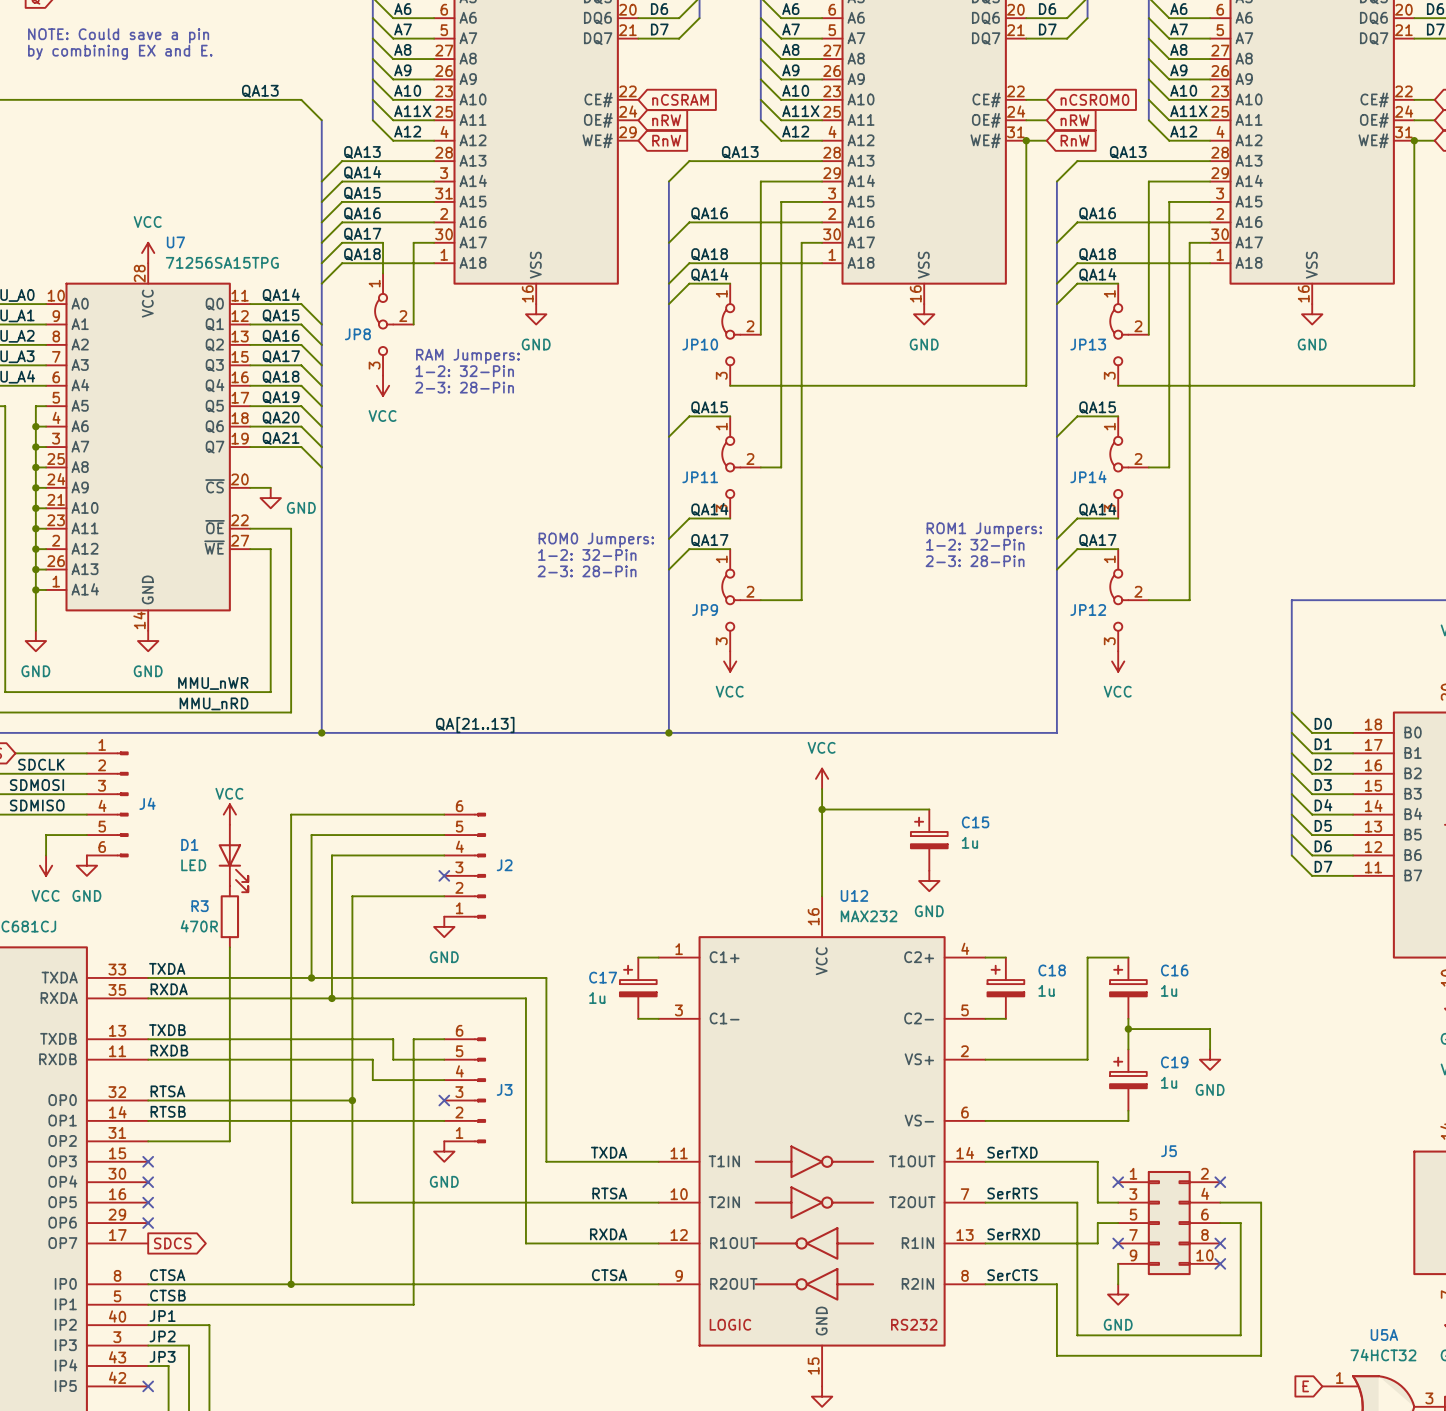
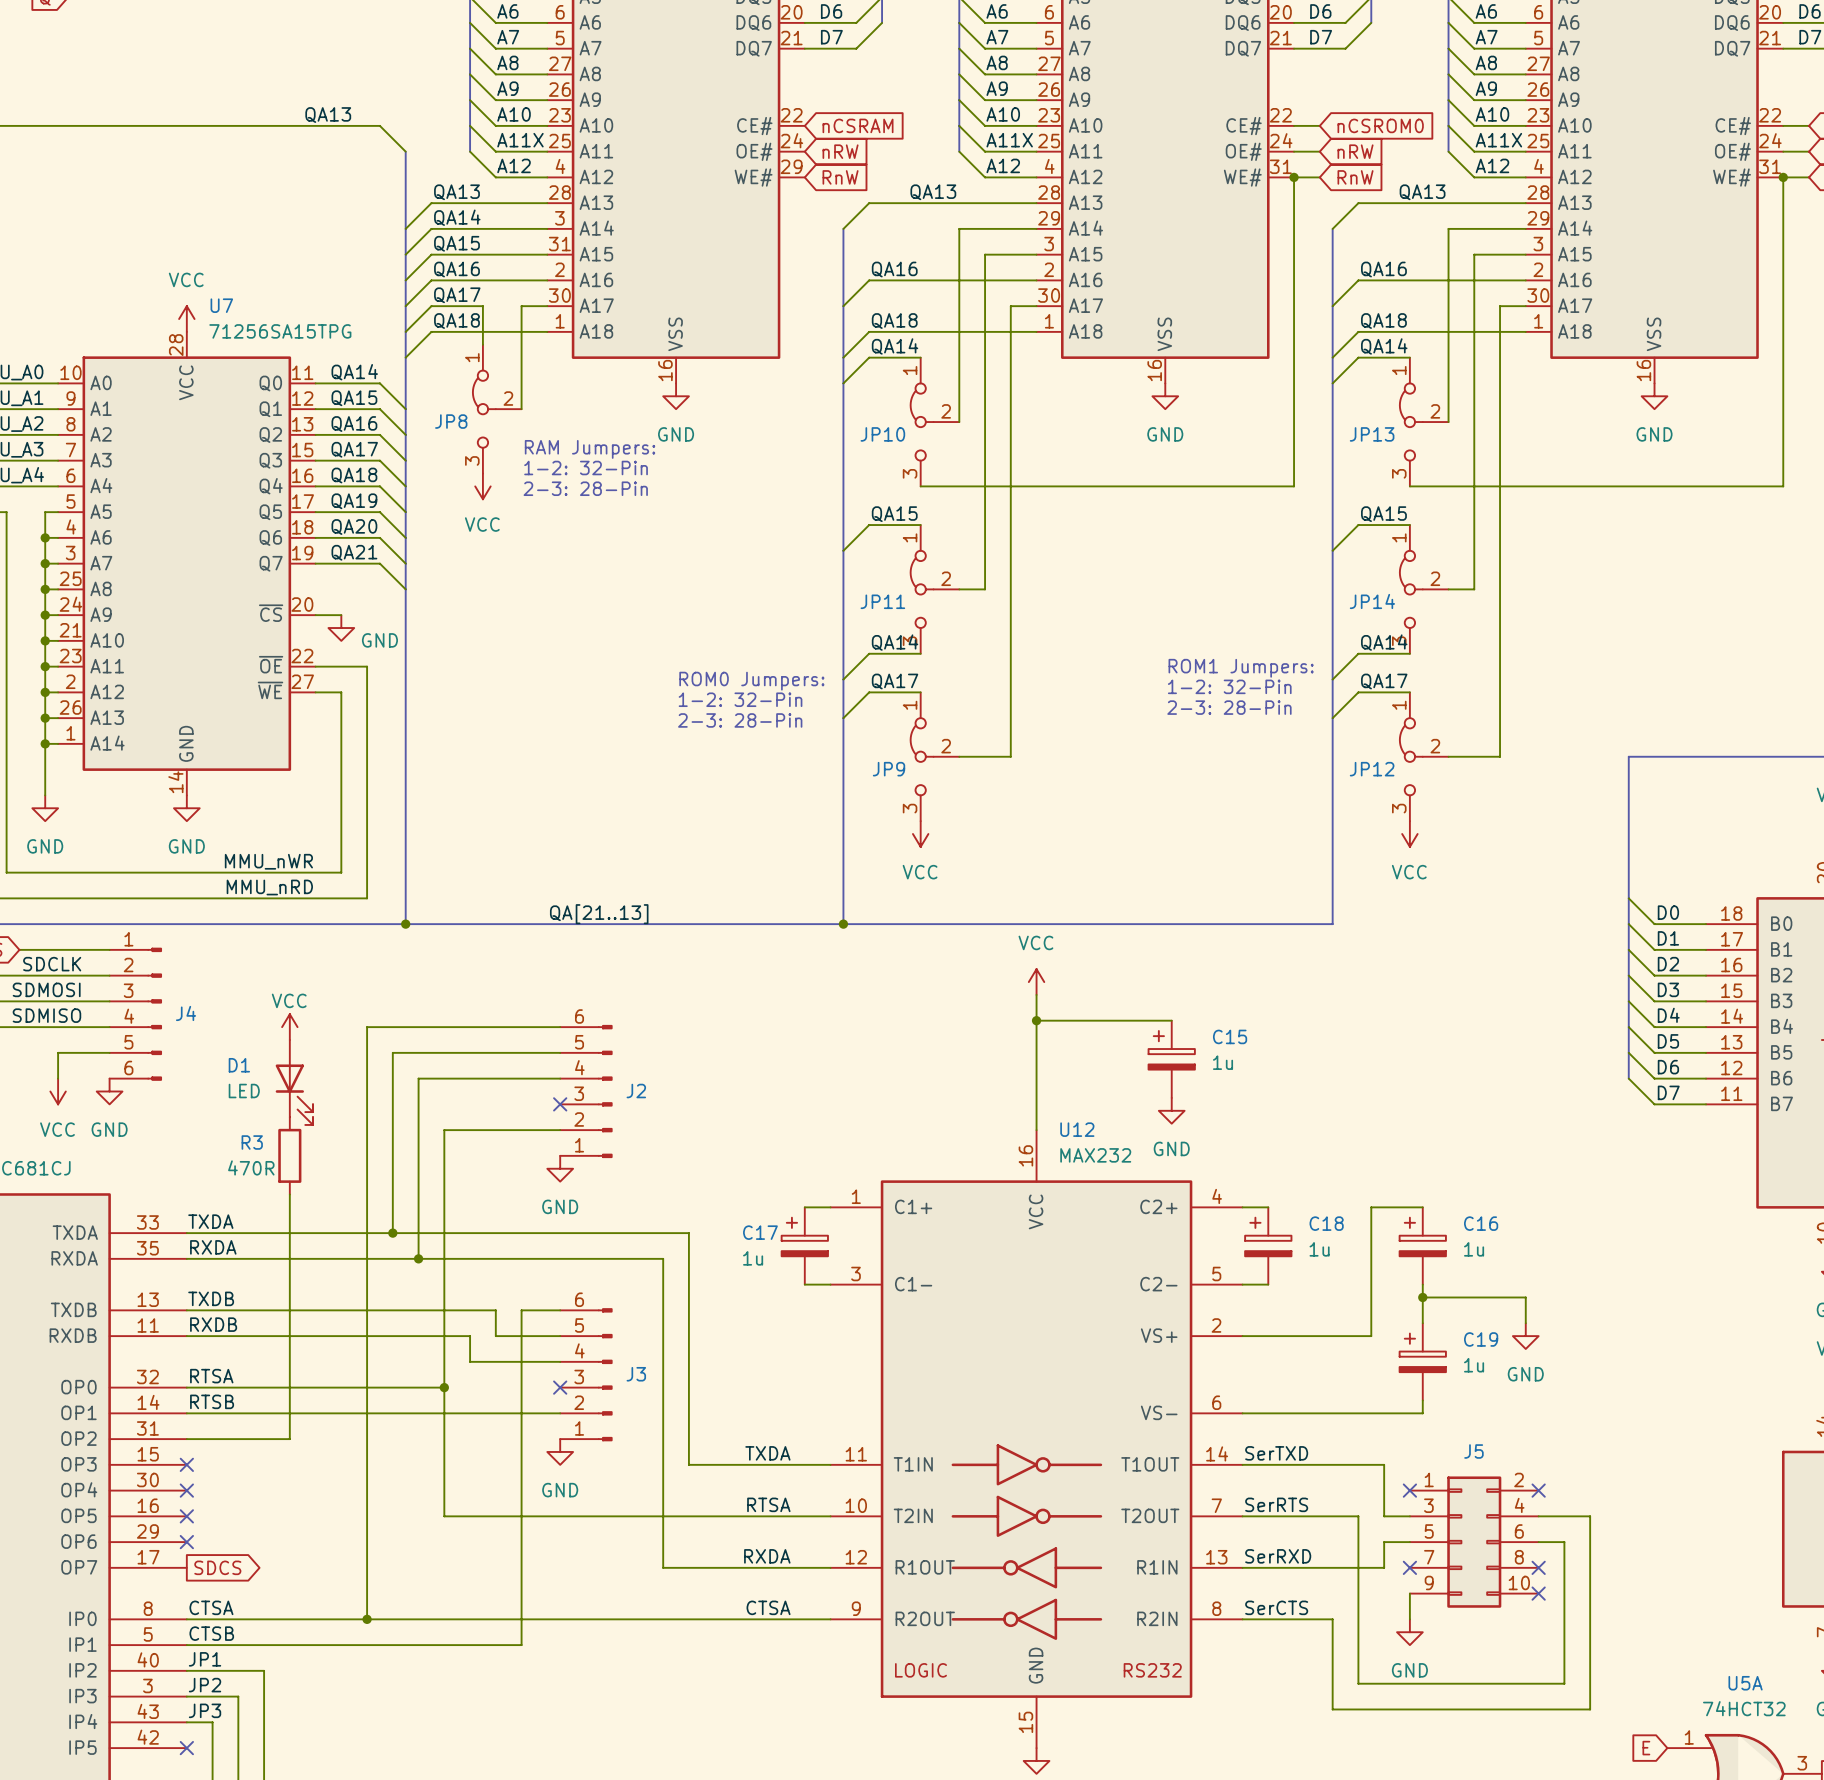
text: NOTE: Could save a pin (118, 35) -> none
text: by combining EX and E. (120, 52) -> none

